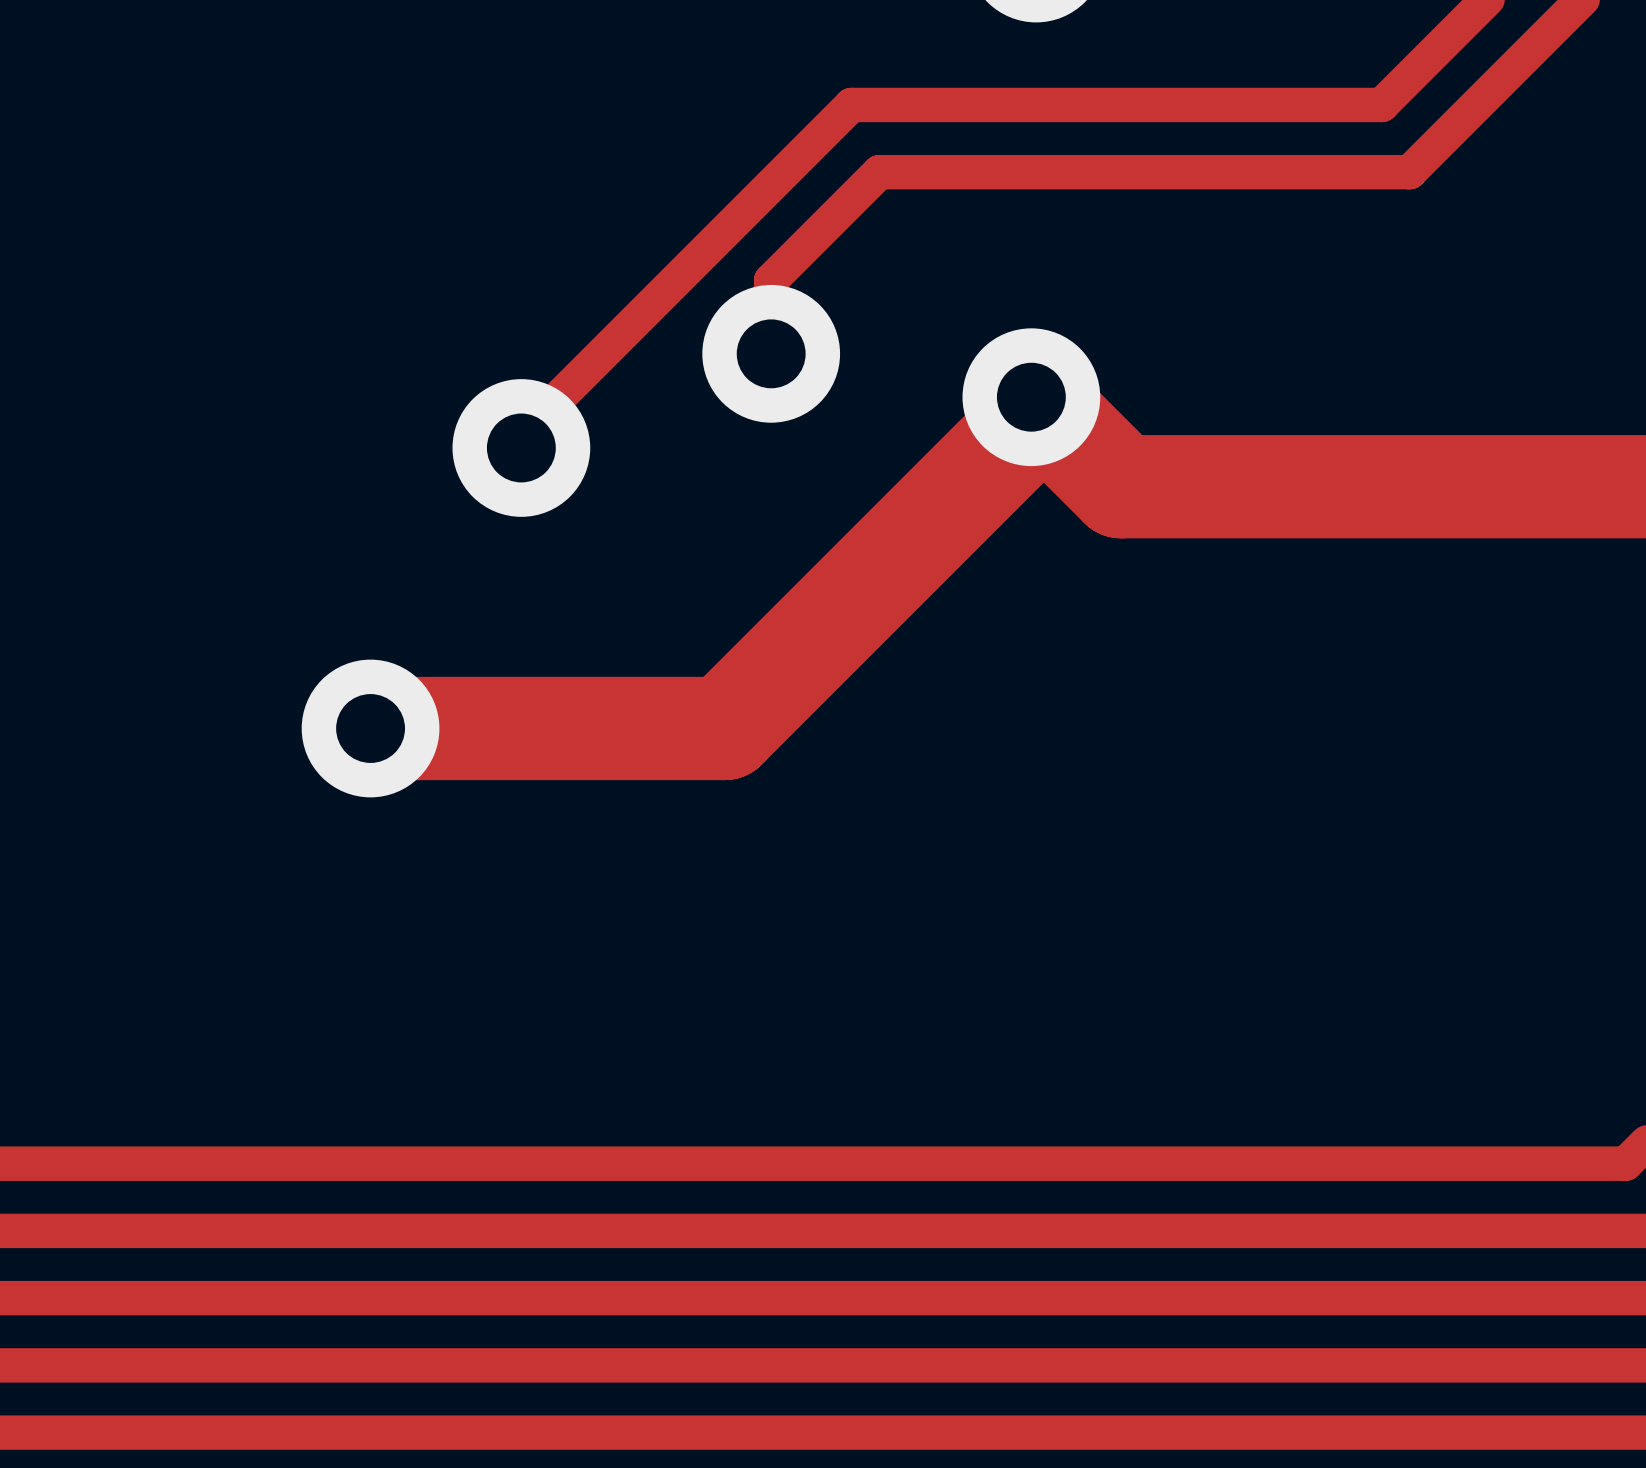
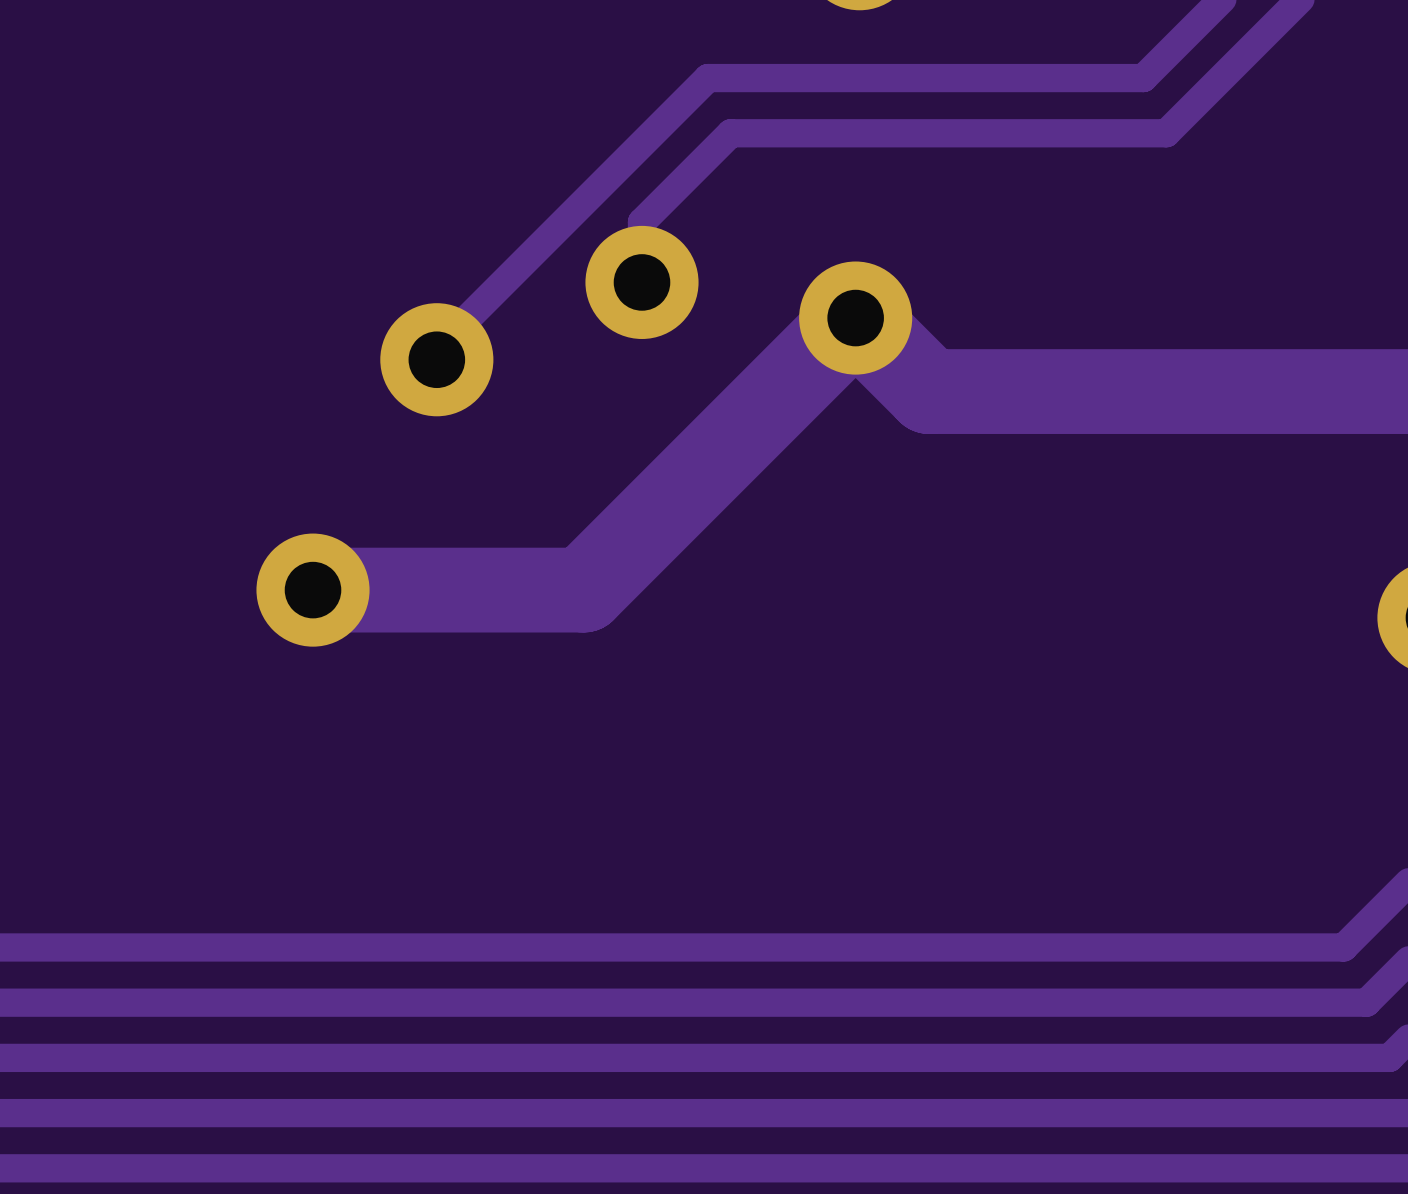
track: (1031, 397) (1031, 422) (724, 728) (700, 728) -> (855, 318) (583, 590)

